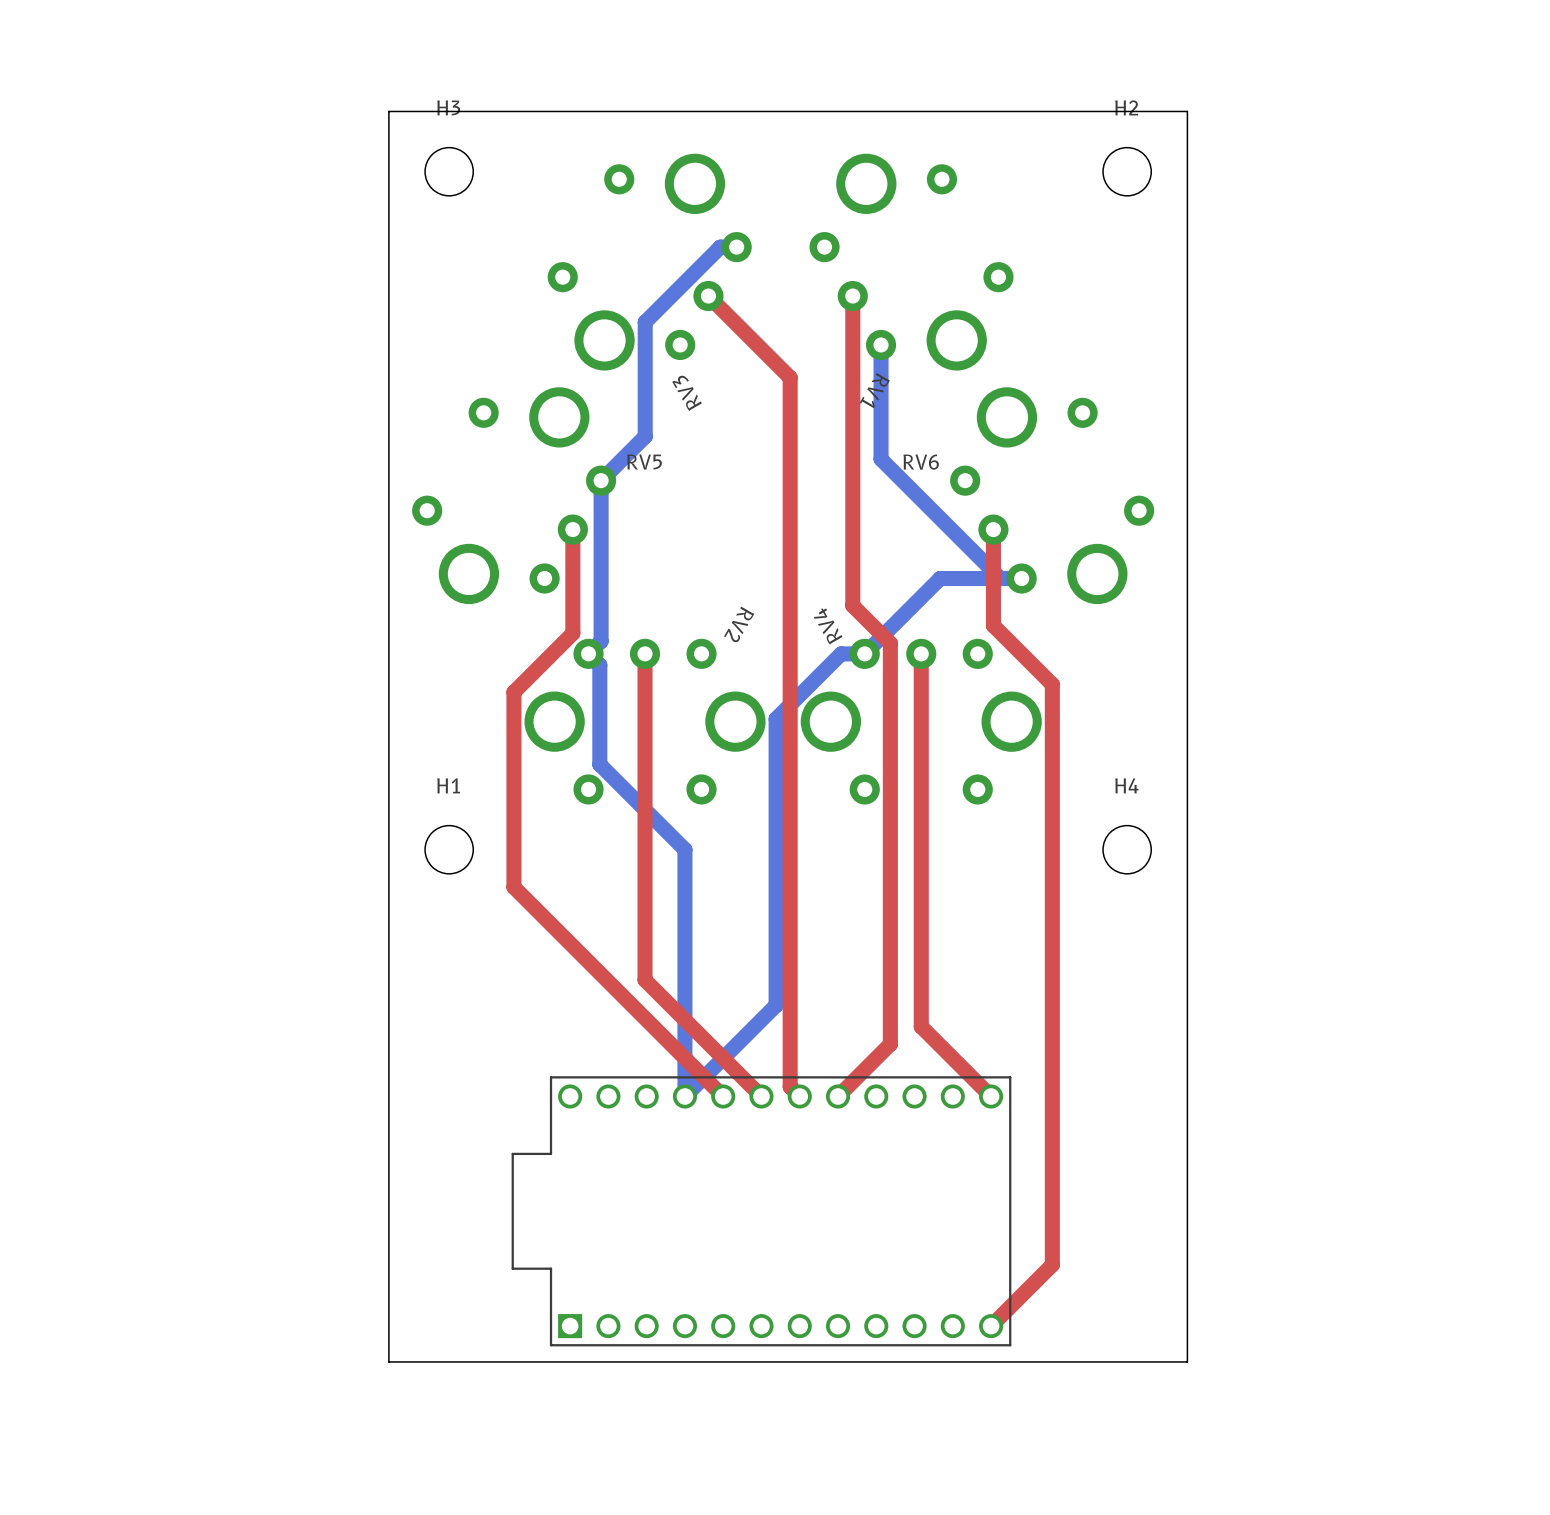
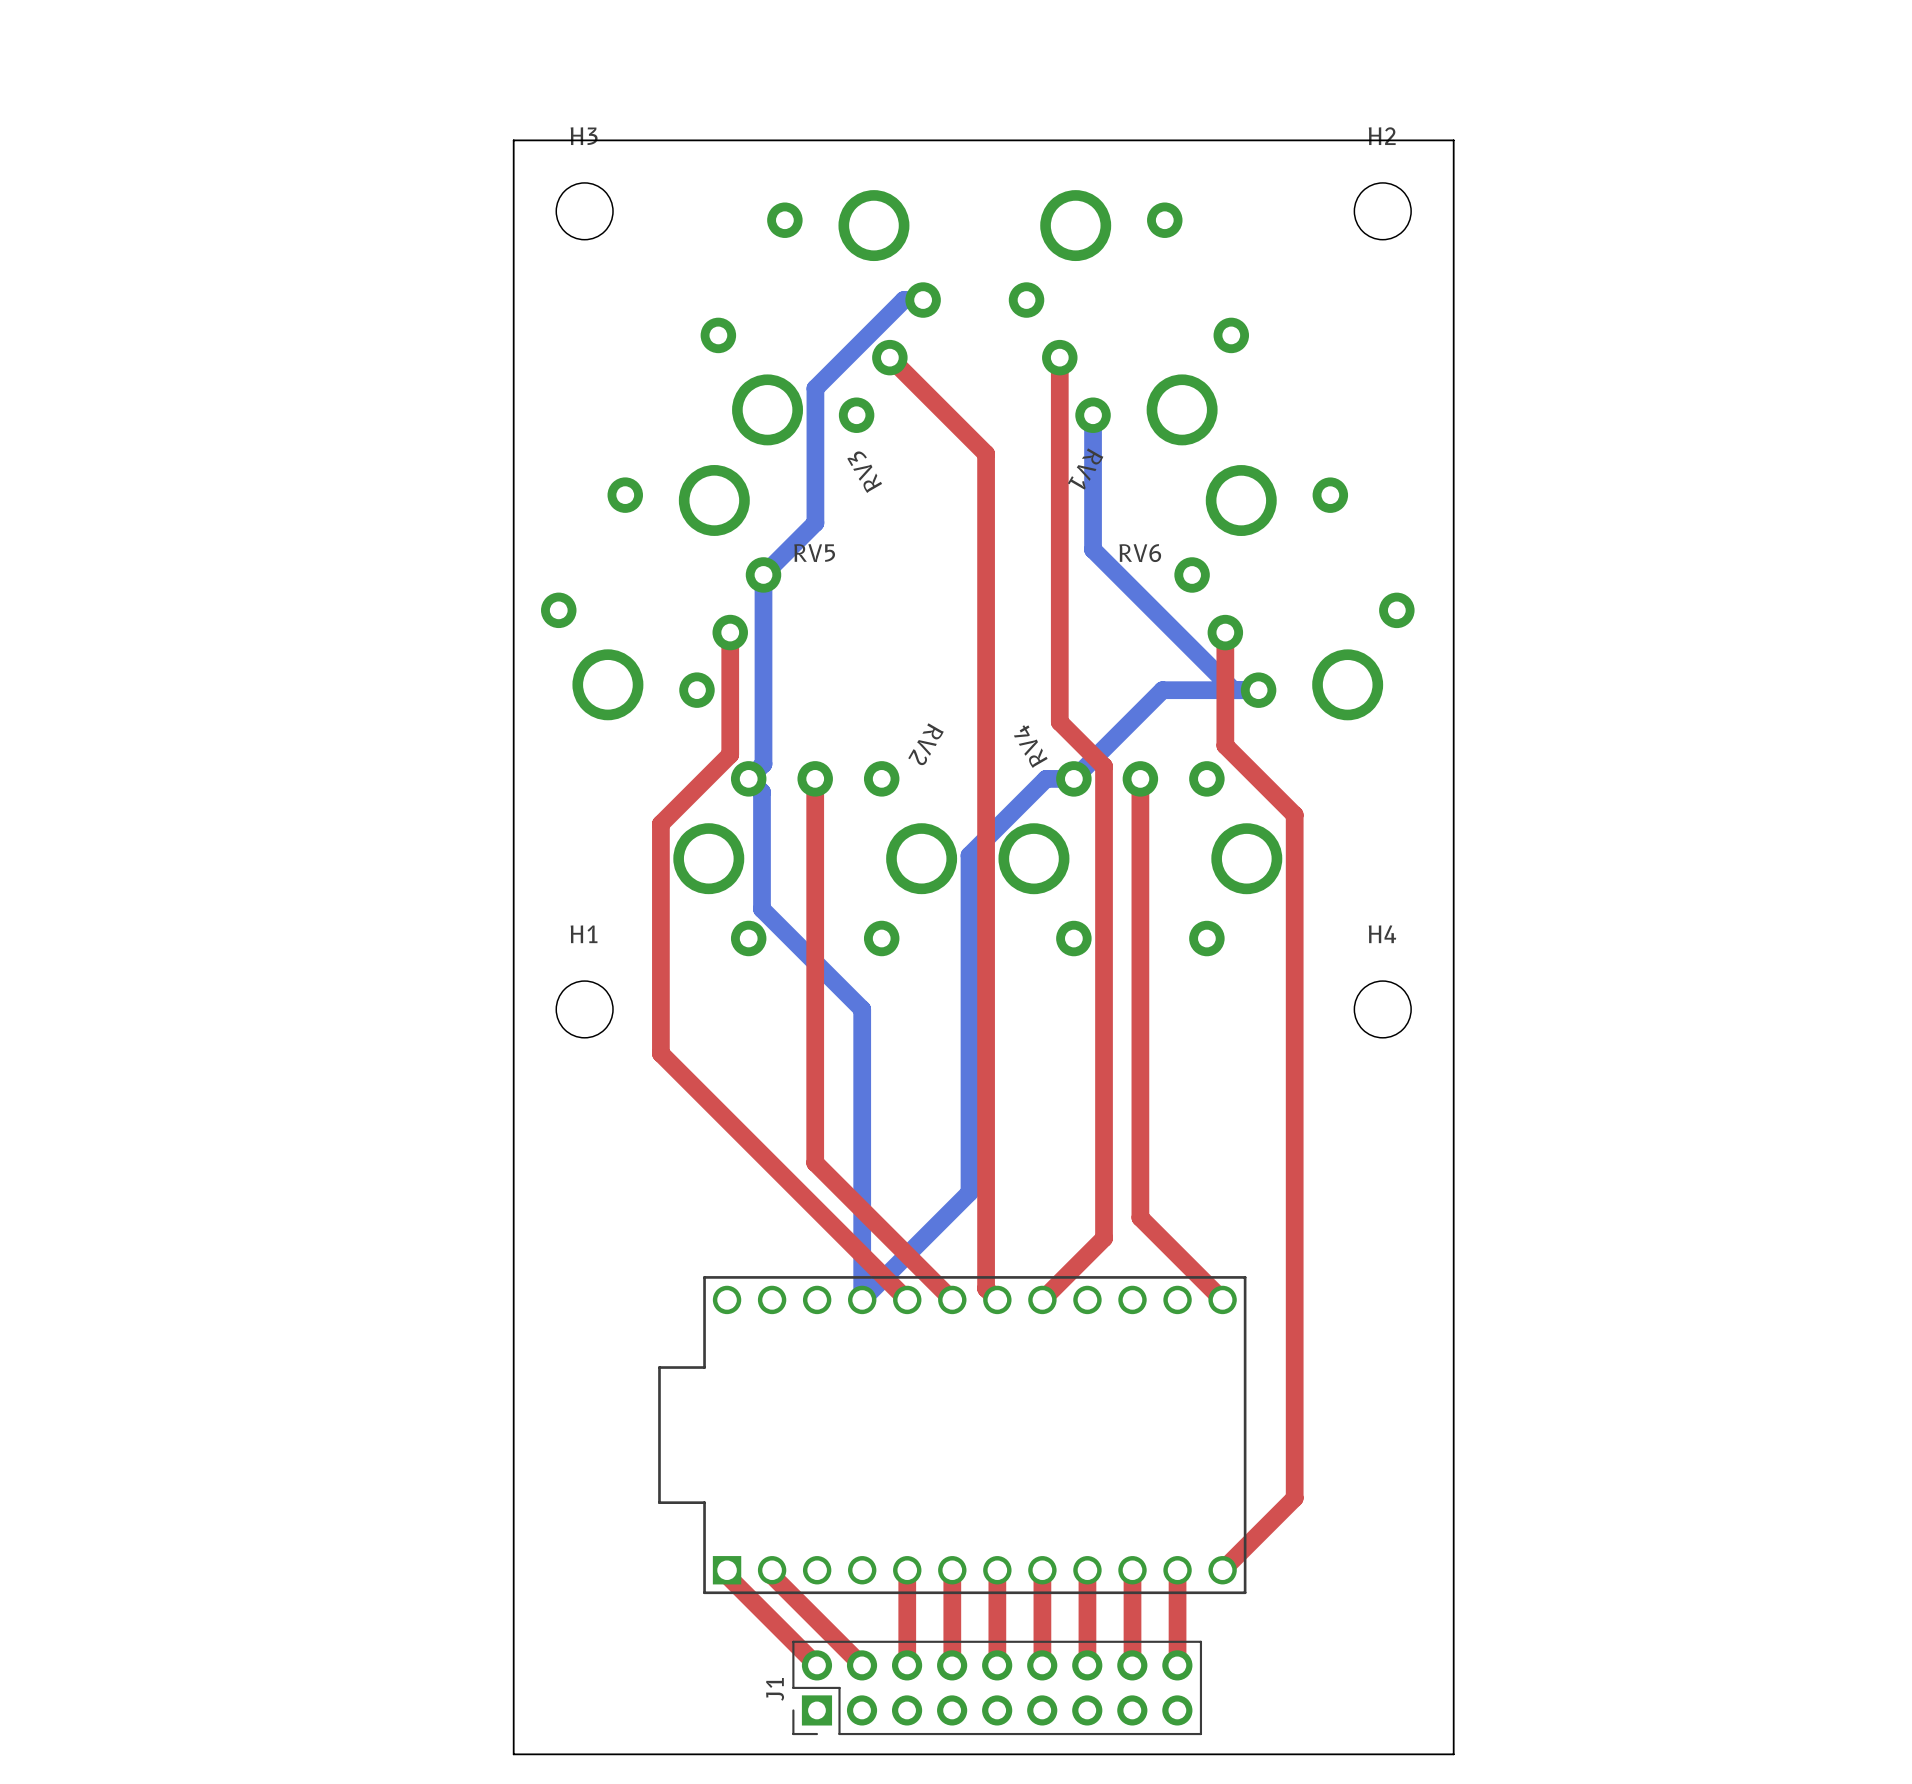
top track: none -> (727, 1570) (727, 1575) (816, 1665)
top track: none -> (772, 1570) (772, 1575) (862, 1665)
top track: none -> (907, 1570) (907, 1665)
top track: none -> (952, 1570) (952, 1665)
top track: none -> (997, 1570) (997, 1665)
top track: none -> (1042, 1570) (1042, 1665)
top track: none -> (1087, 1570) (1087, 1665)
top track: none -> (1132, 1570) (1132, 1665)
top track: none -> (1177, 1570) (1177, 1665)
board edge: (388, 1361) (1187, 1361) -> (513, 1612) (513, 1754) (1453, 1754) (1453, 1612)
J1: none -> (997, 1687)

